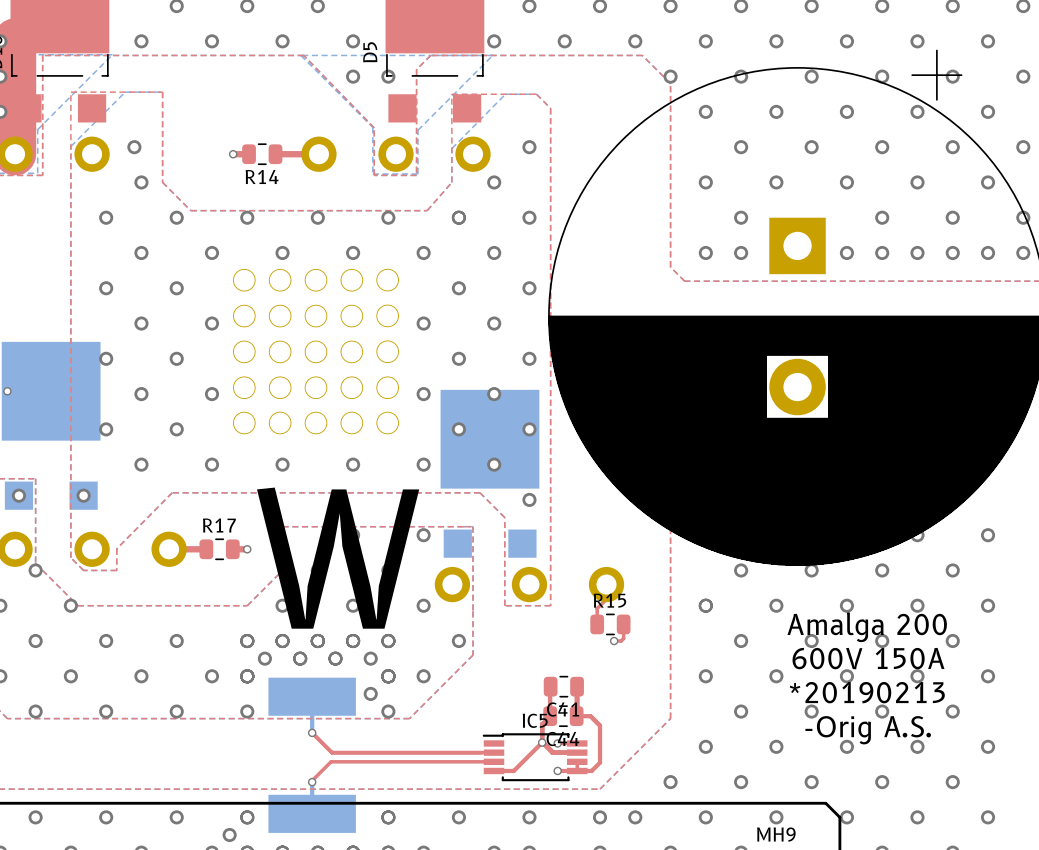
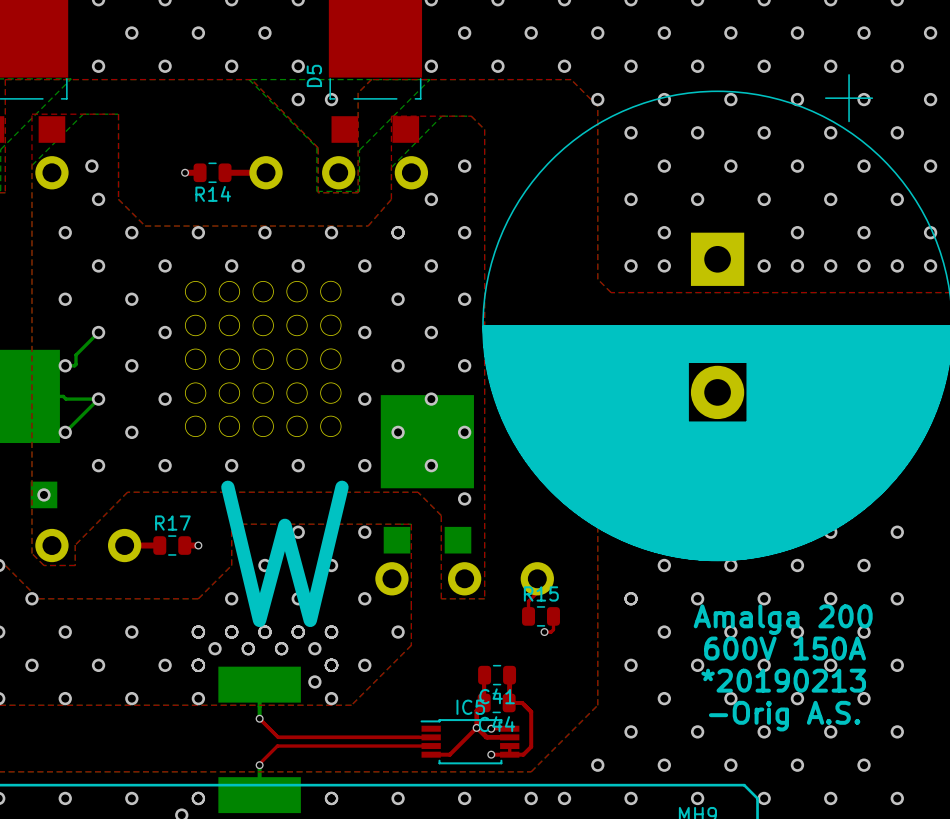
bottom track: none -> (98, 332) (76, 355) (76, 364) (65, 365)
bottom track: none -> (13, 396) (63, 396) (65, 399) (98, 399) (65, 432)

